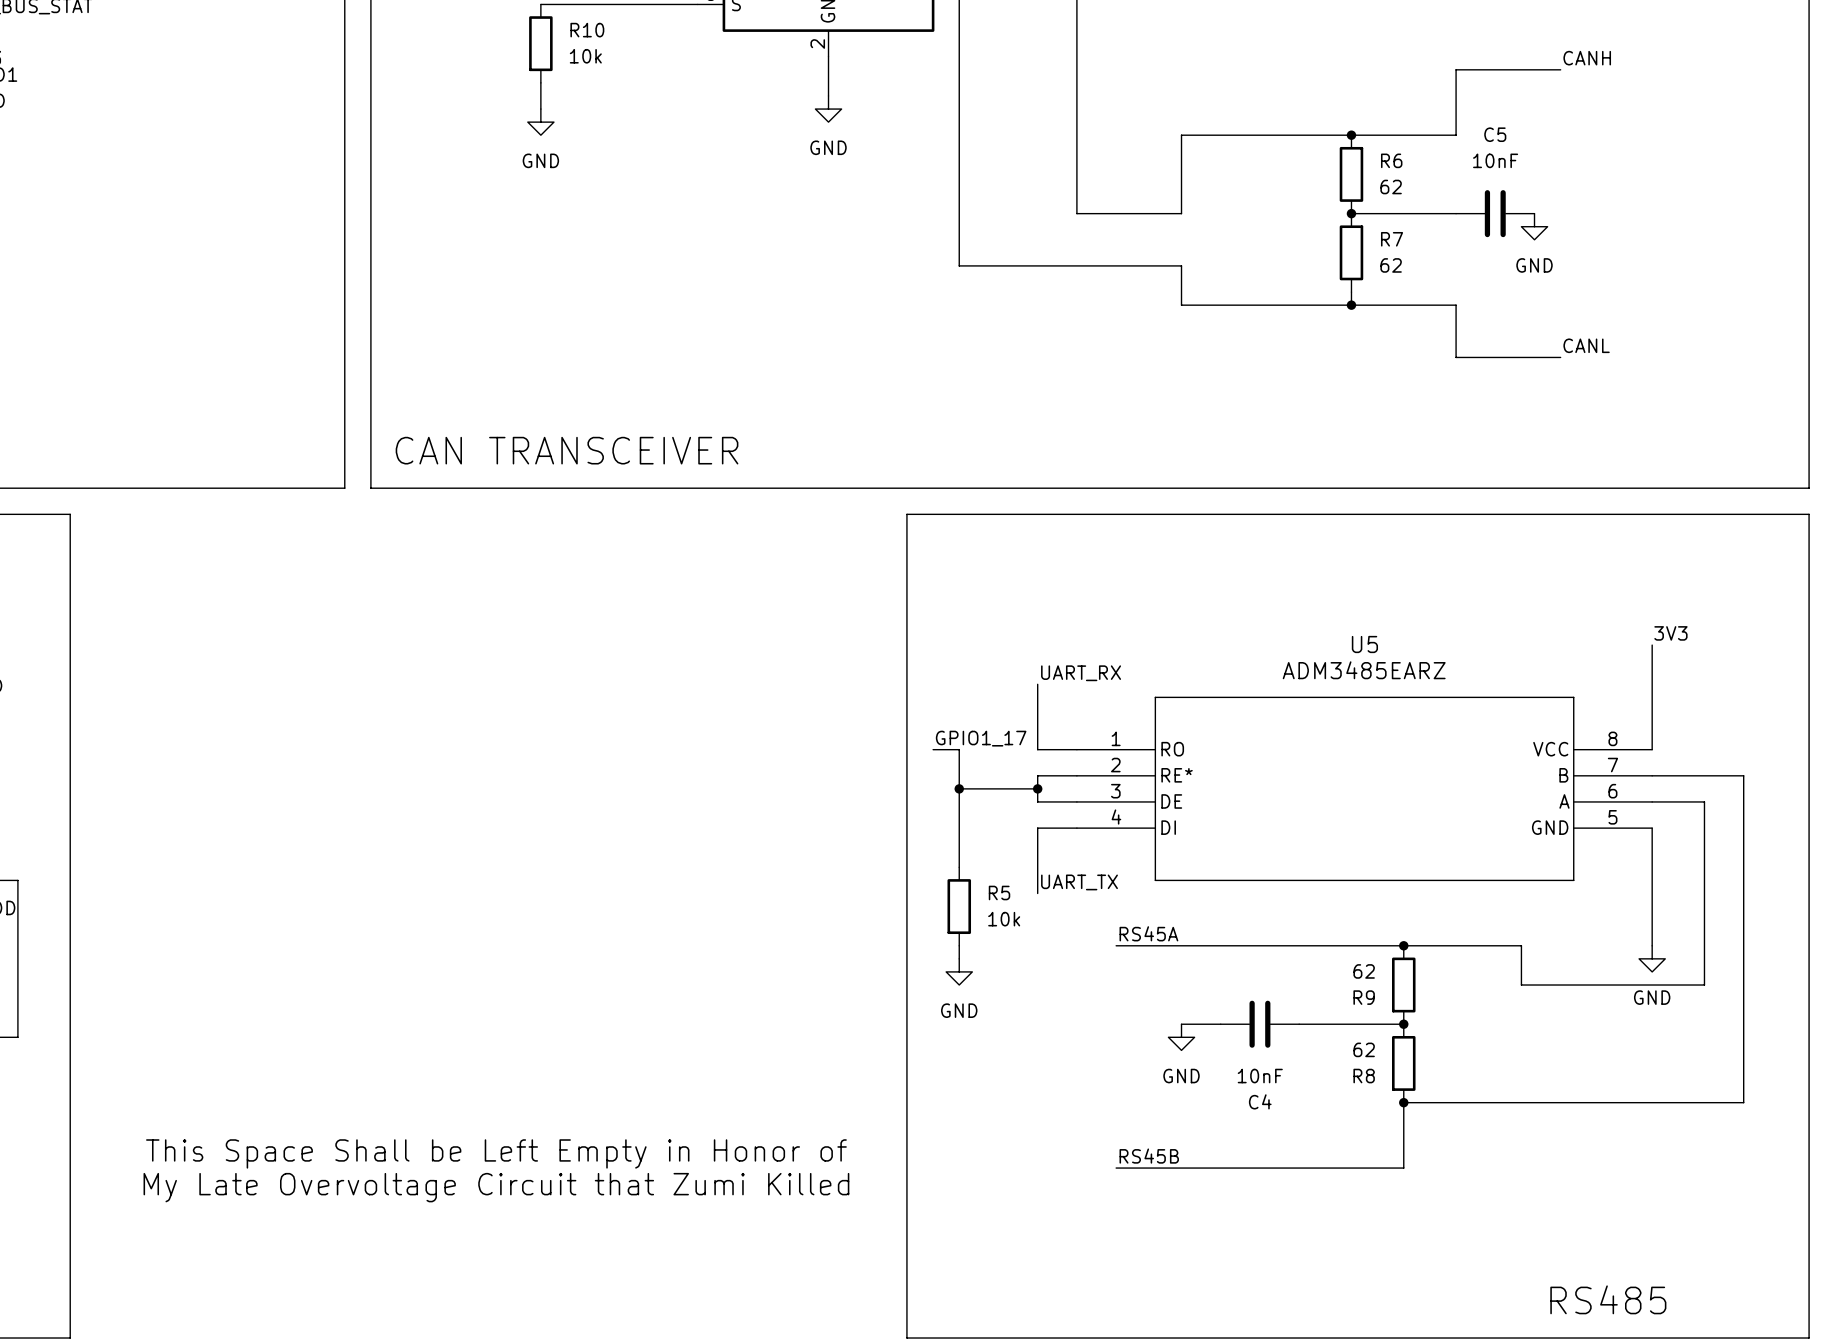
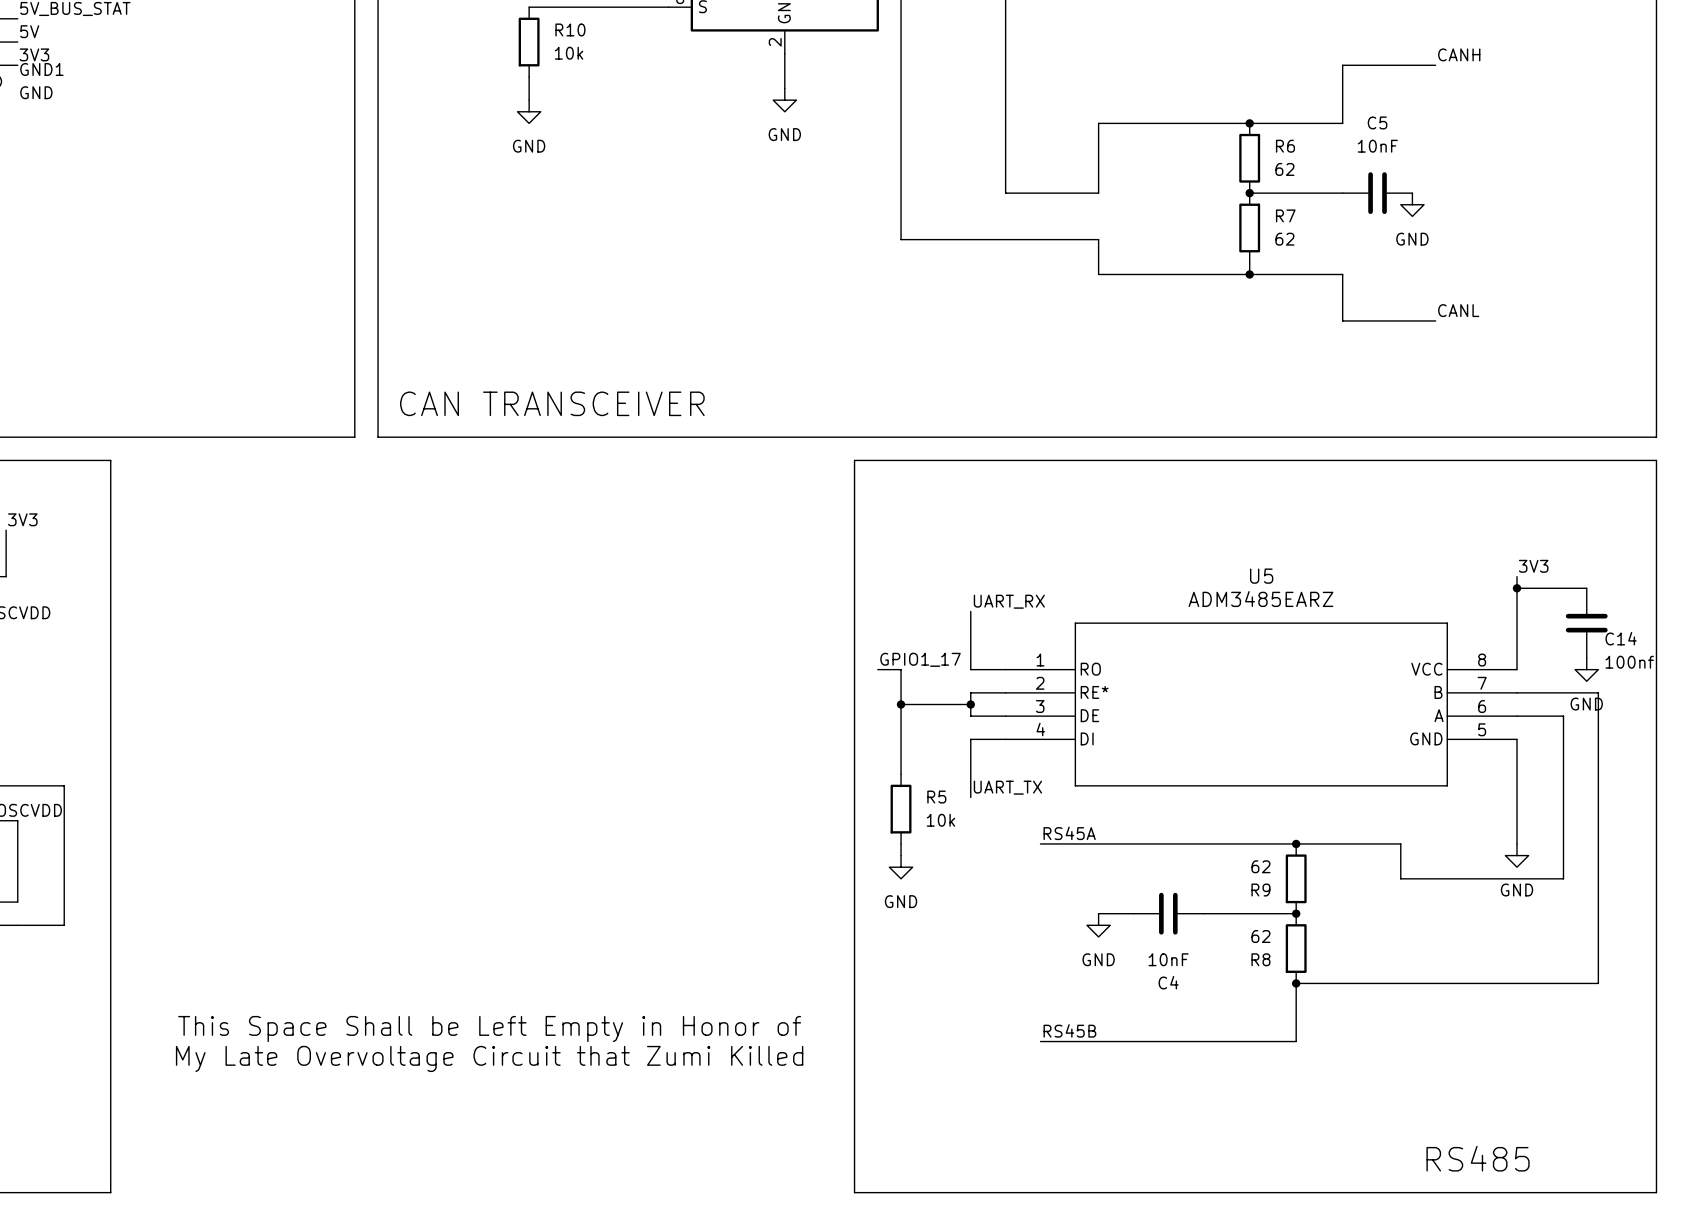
wire: none -> (1517, 588) (1586, 588)
junction: none -> (1517, 588)
C14: none -> 100nf (1586, 623)
power symbol: none -> GND (1586, 669)

